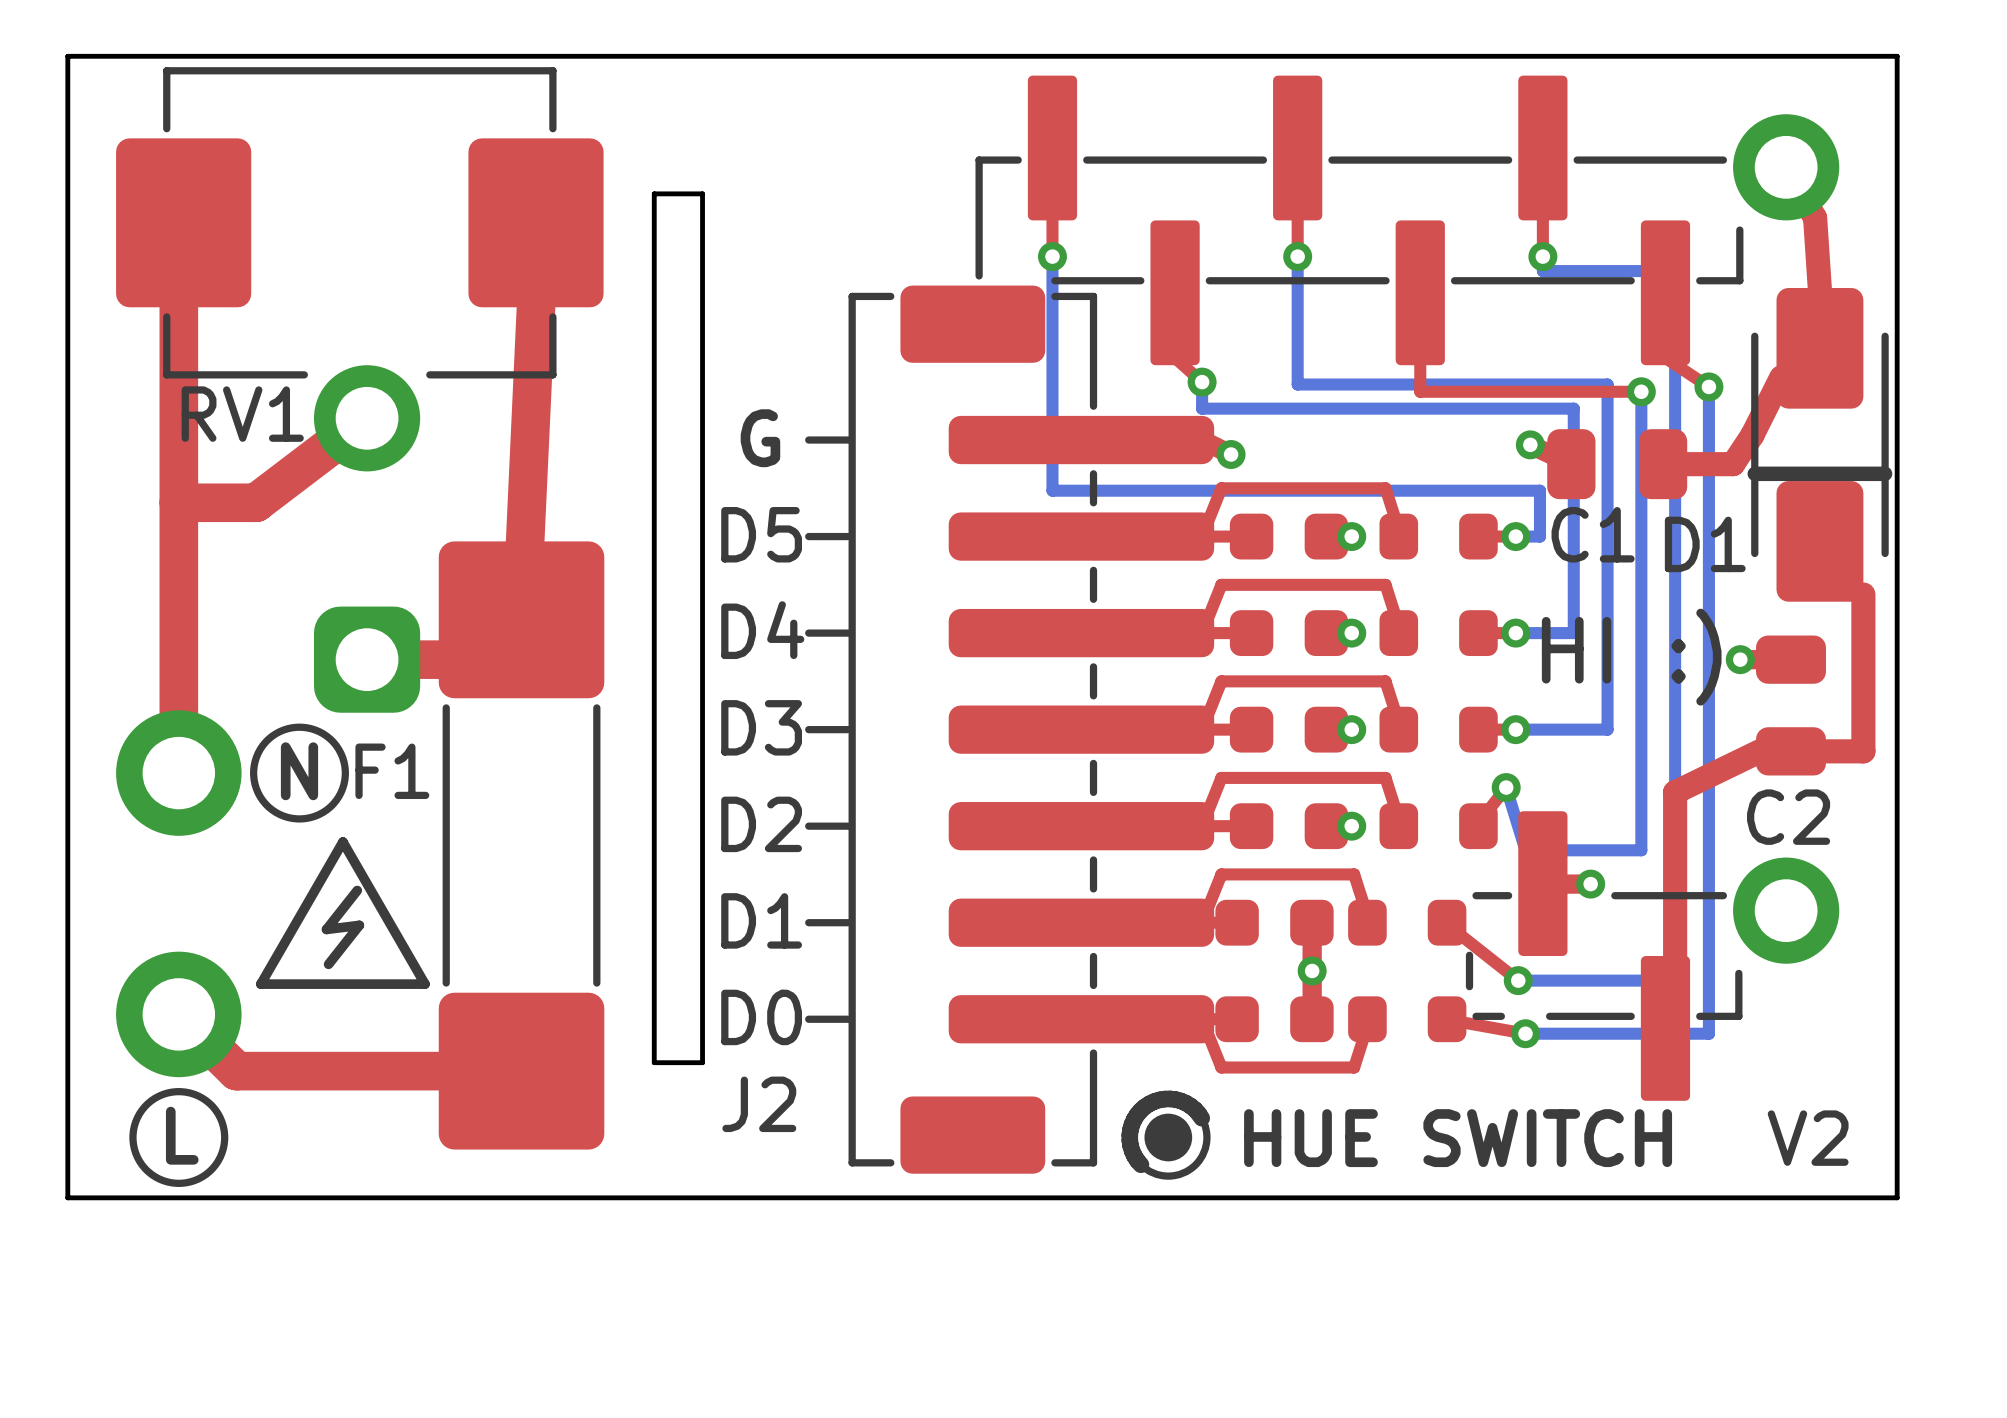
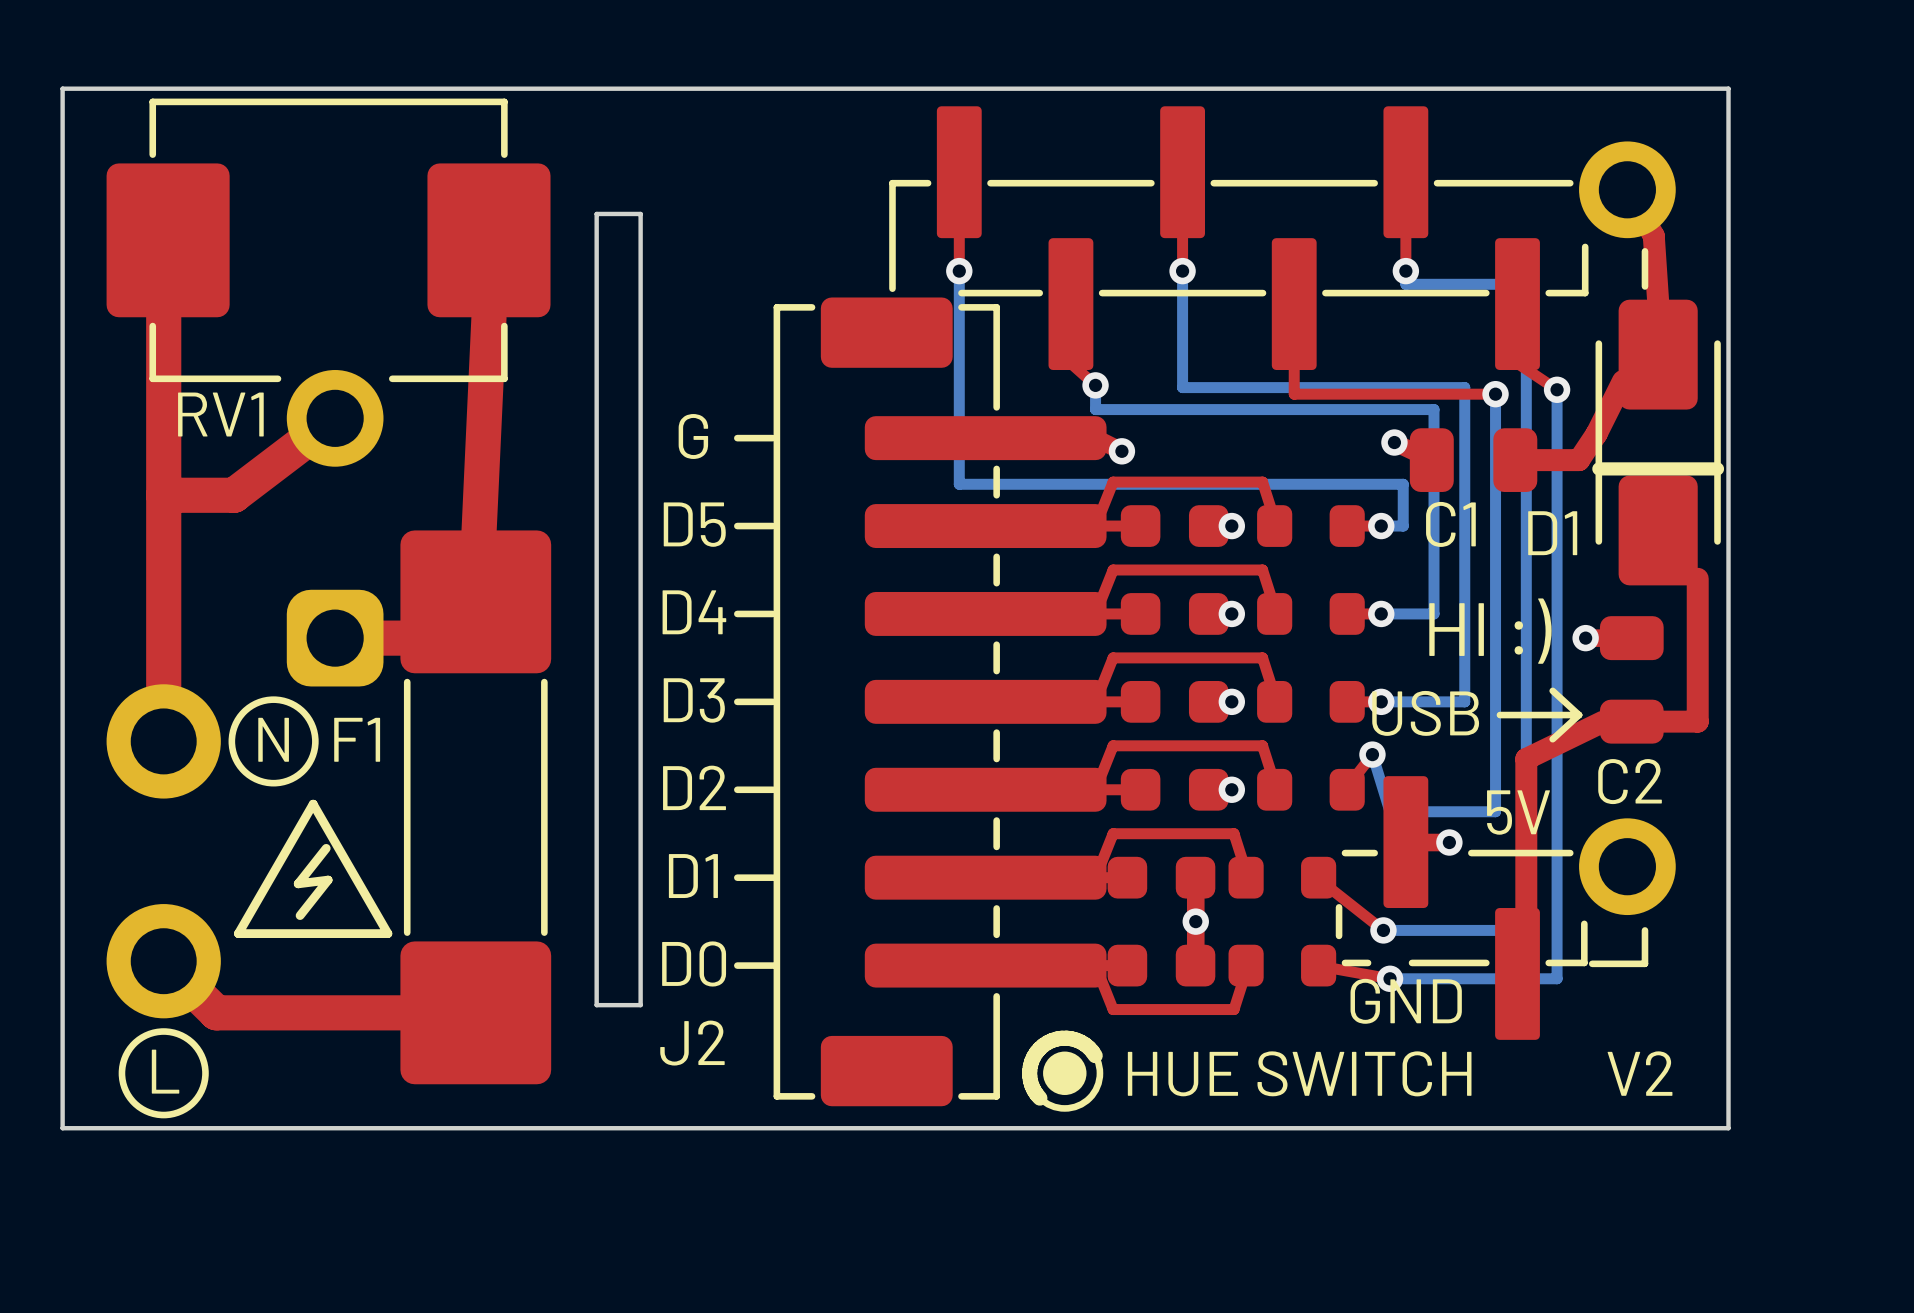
line: none -> (1644, 251) (1644, 286)
line: none -> (1552, 690) (1579, 715)
text: none -> USB (1425, 713)
line: none -> (1499, 715) (1579, 715)
line: none -> (1579, 715) (1552, 739)
text: none -> 5V (1518, 812)
line: none -> (1644, 930) (1644, 963) (1592, 963)
text: none -> GND (1406, 1001)

